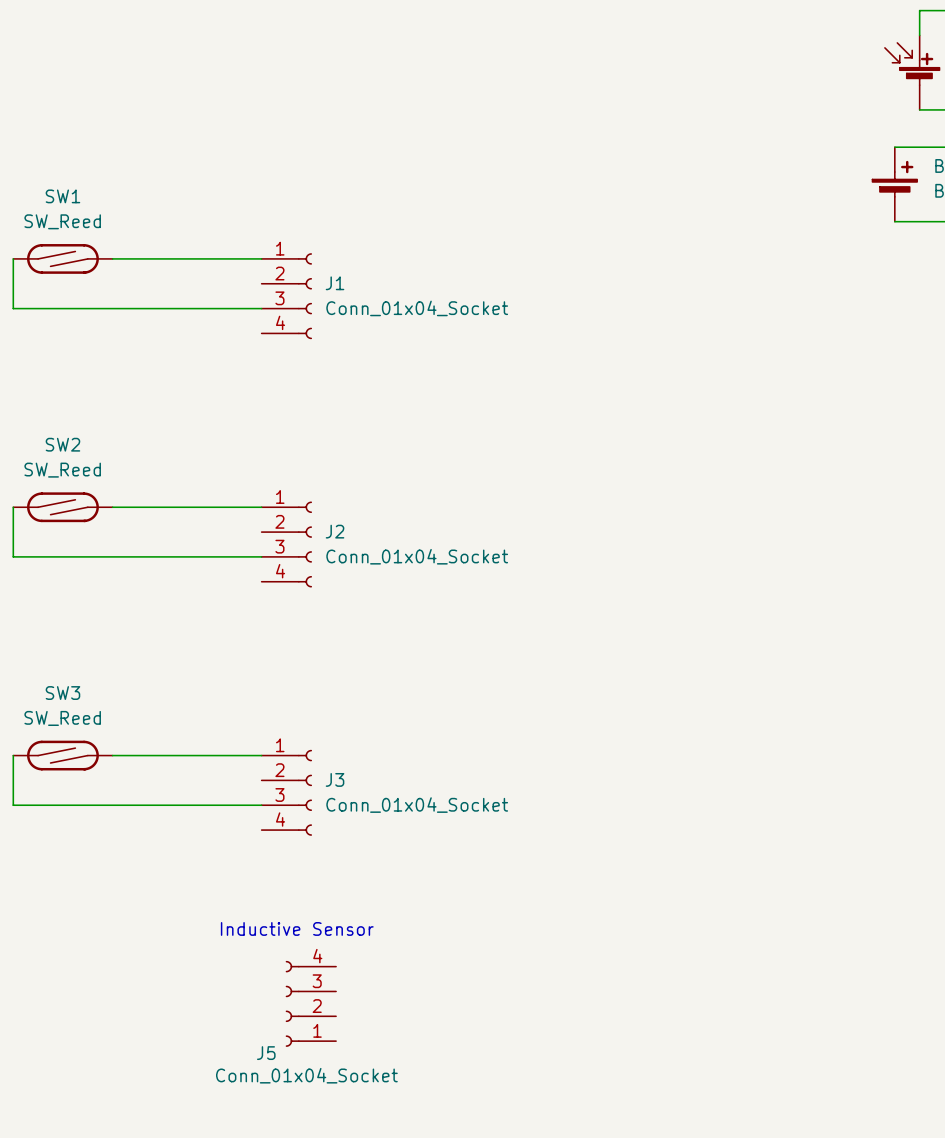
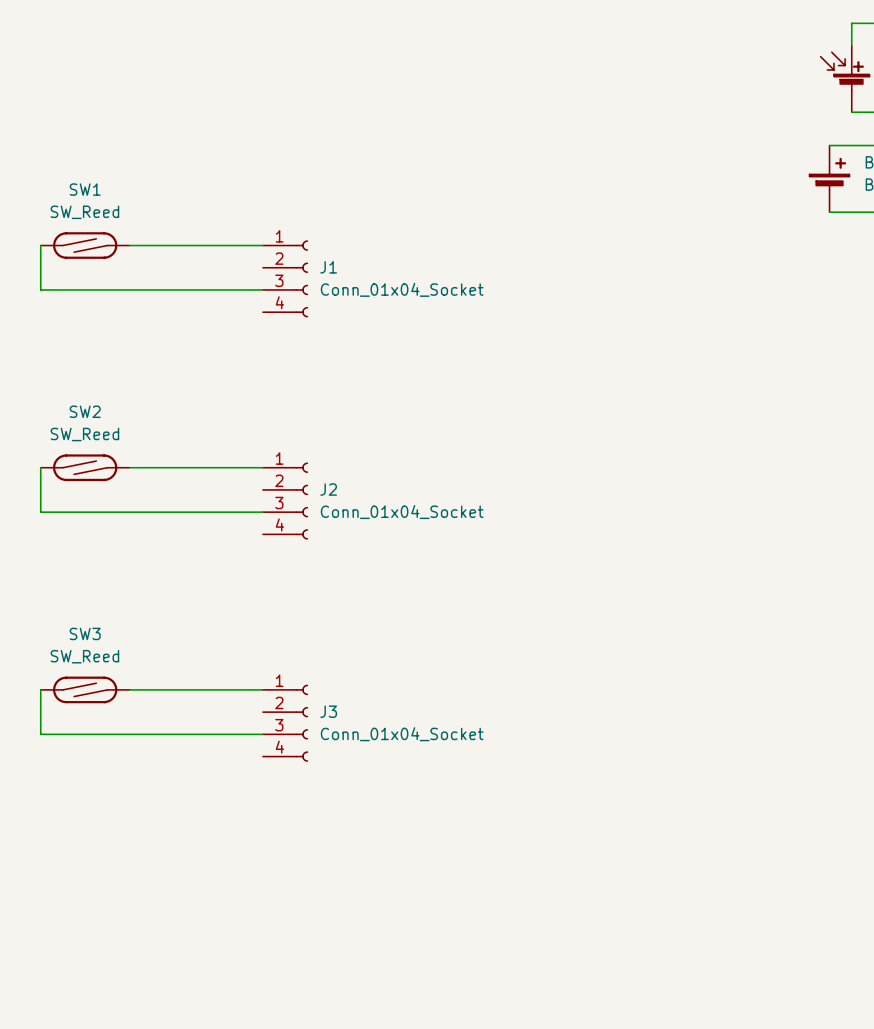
text: Inductive Sensor (297, 928) -> none
J5: Conn_01x04_Socket (310, 1003) -> none

